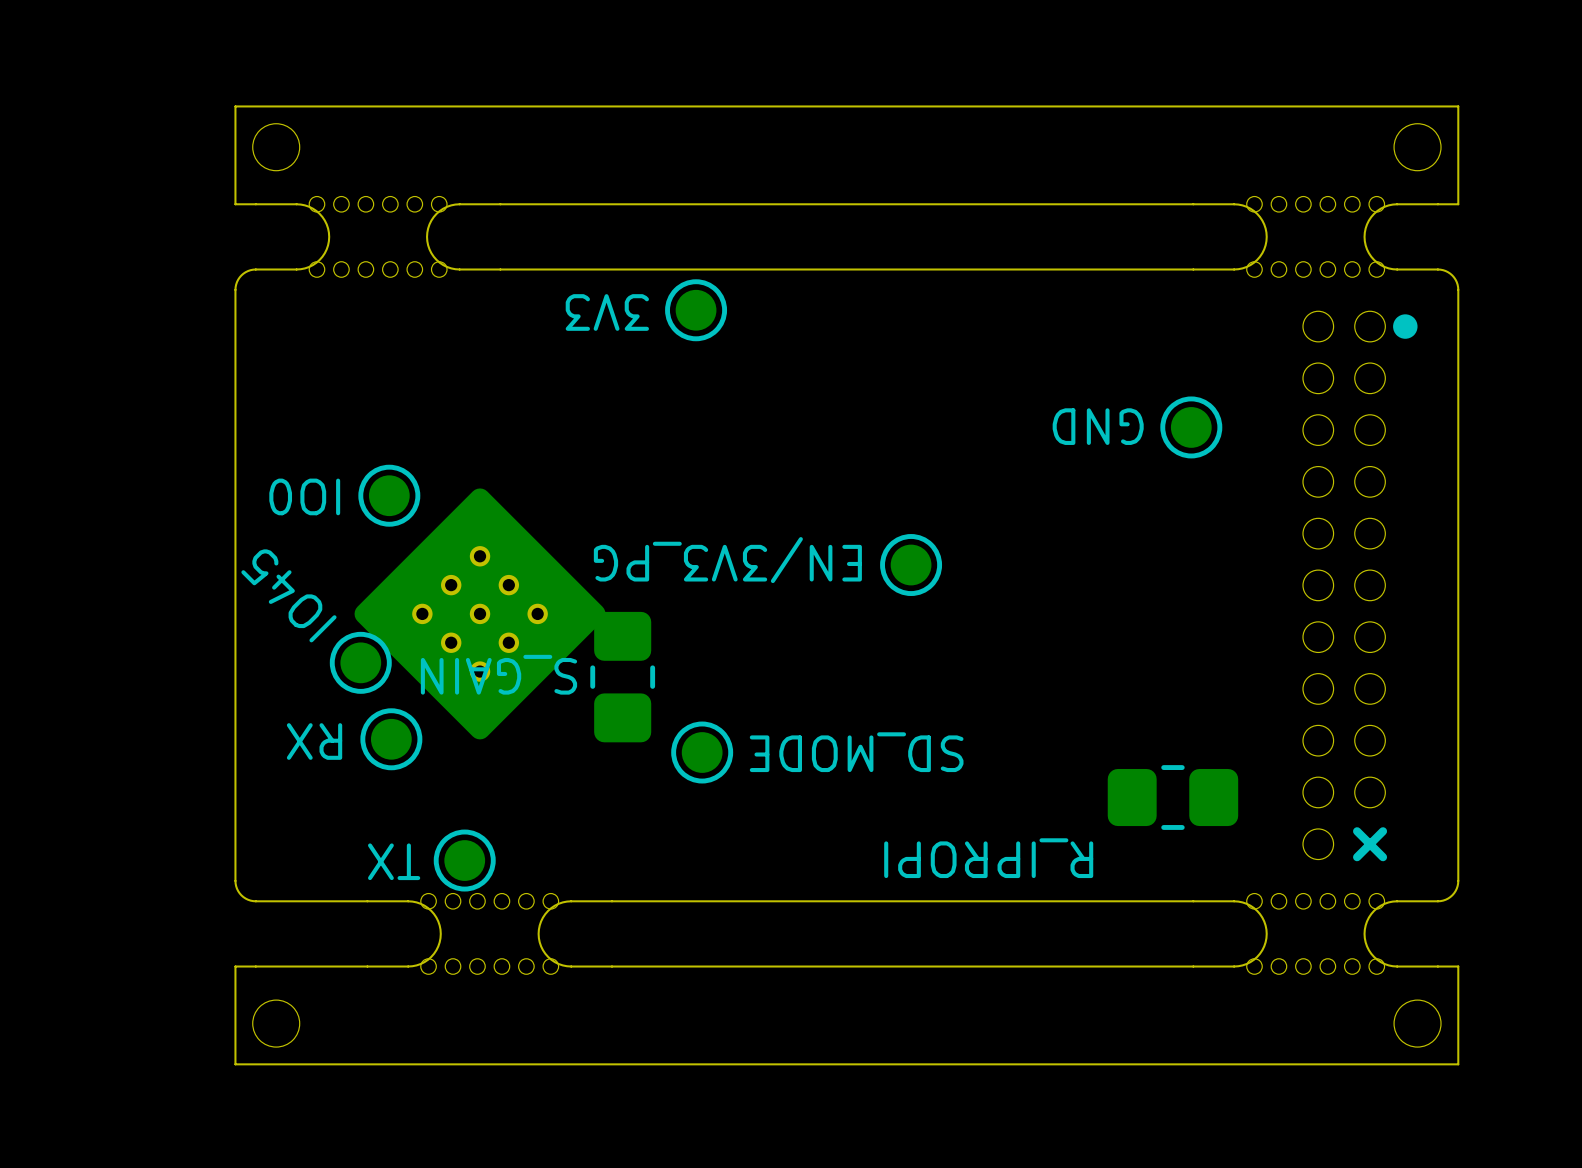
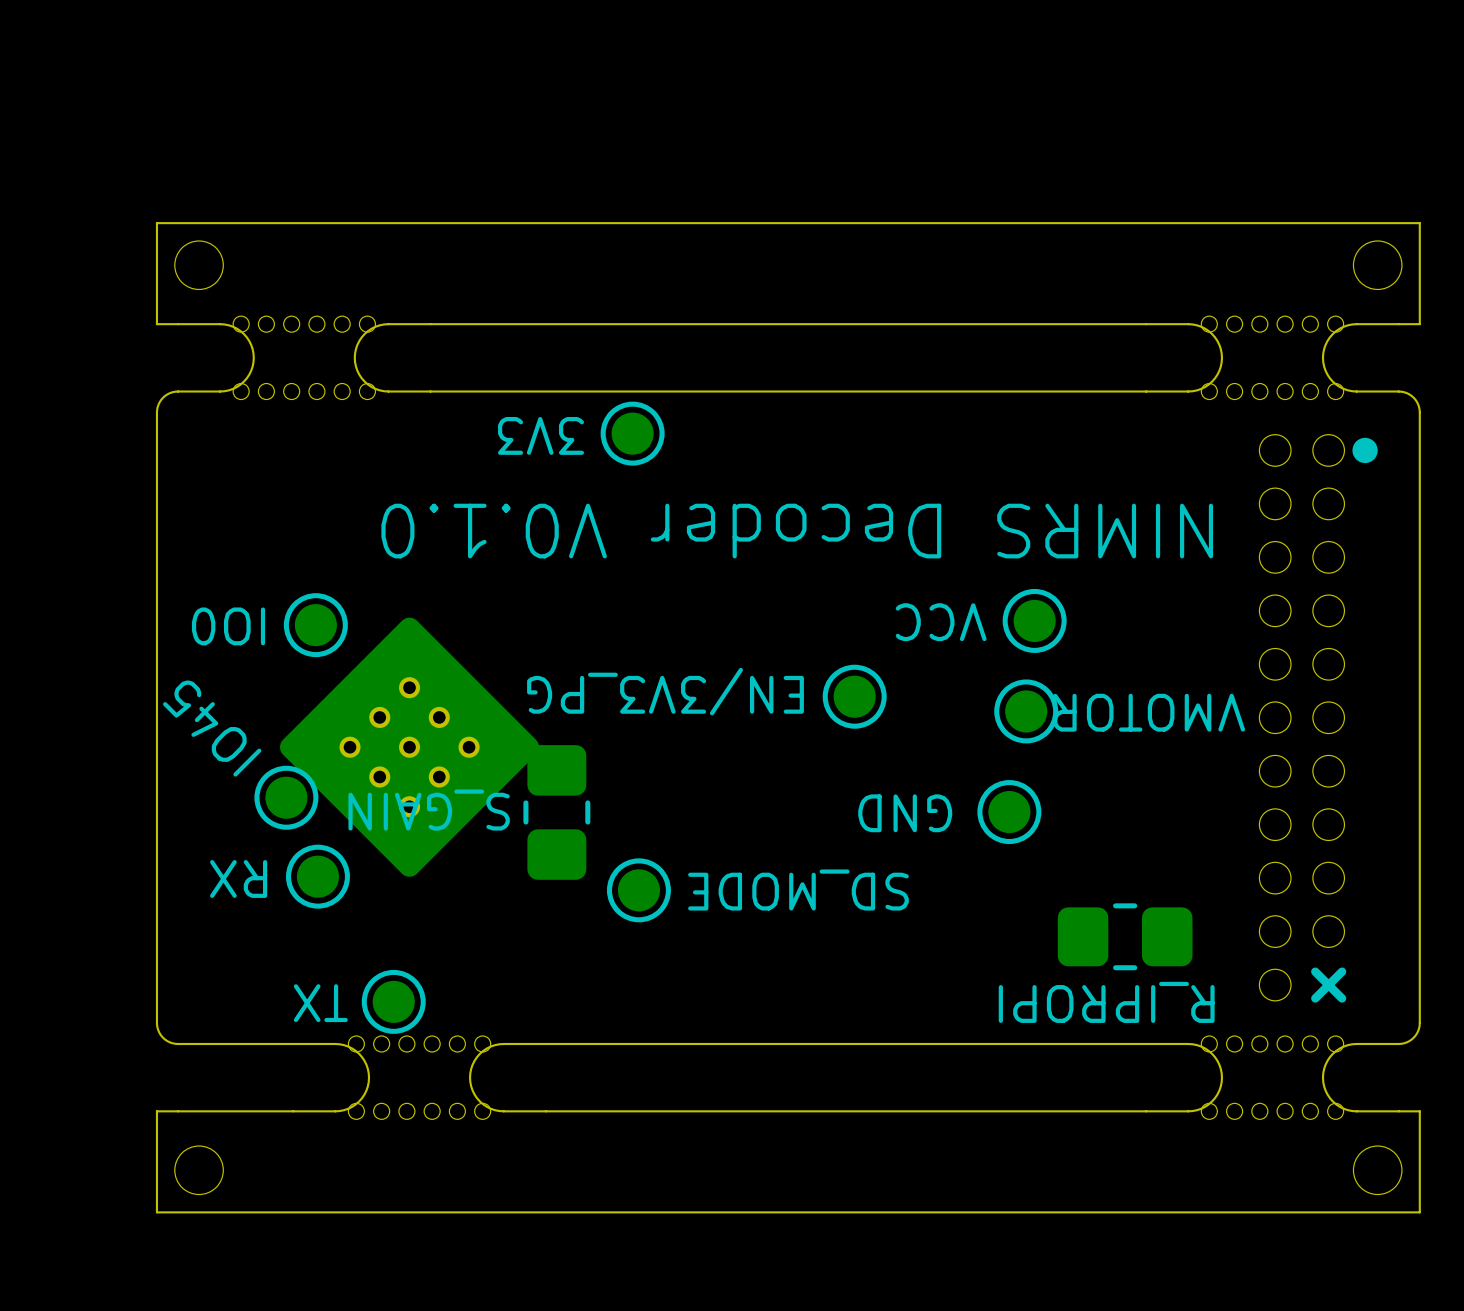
text: none -> NIMRS Decoder V0.1.0 (797, 531)
text position: GND (1098, 426) -> GND (905, 813)
part: (1191, 427) -> none
part: none -> (1034, 620)
text: none -> VCC (941, 622)
part: none -> (1026, 711)
text: none -> VMOTOR (1149, 712)
part: none -> (1009, 812)
text position: R_IPROPI (988, 858) -> R_IPROPI (1106, 1002)

